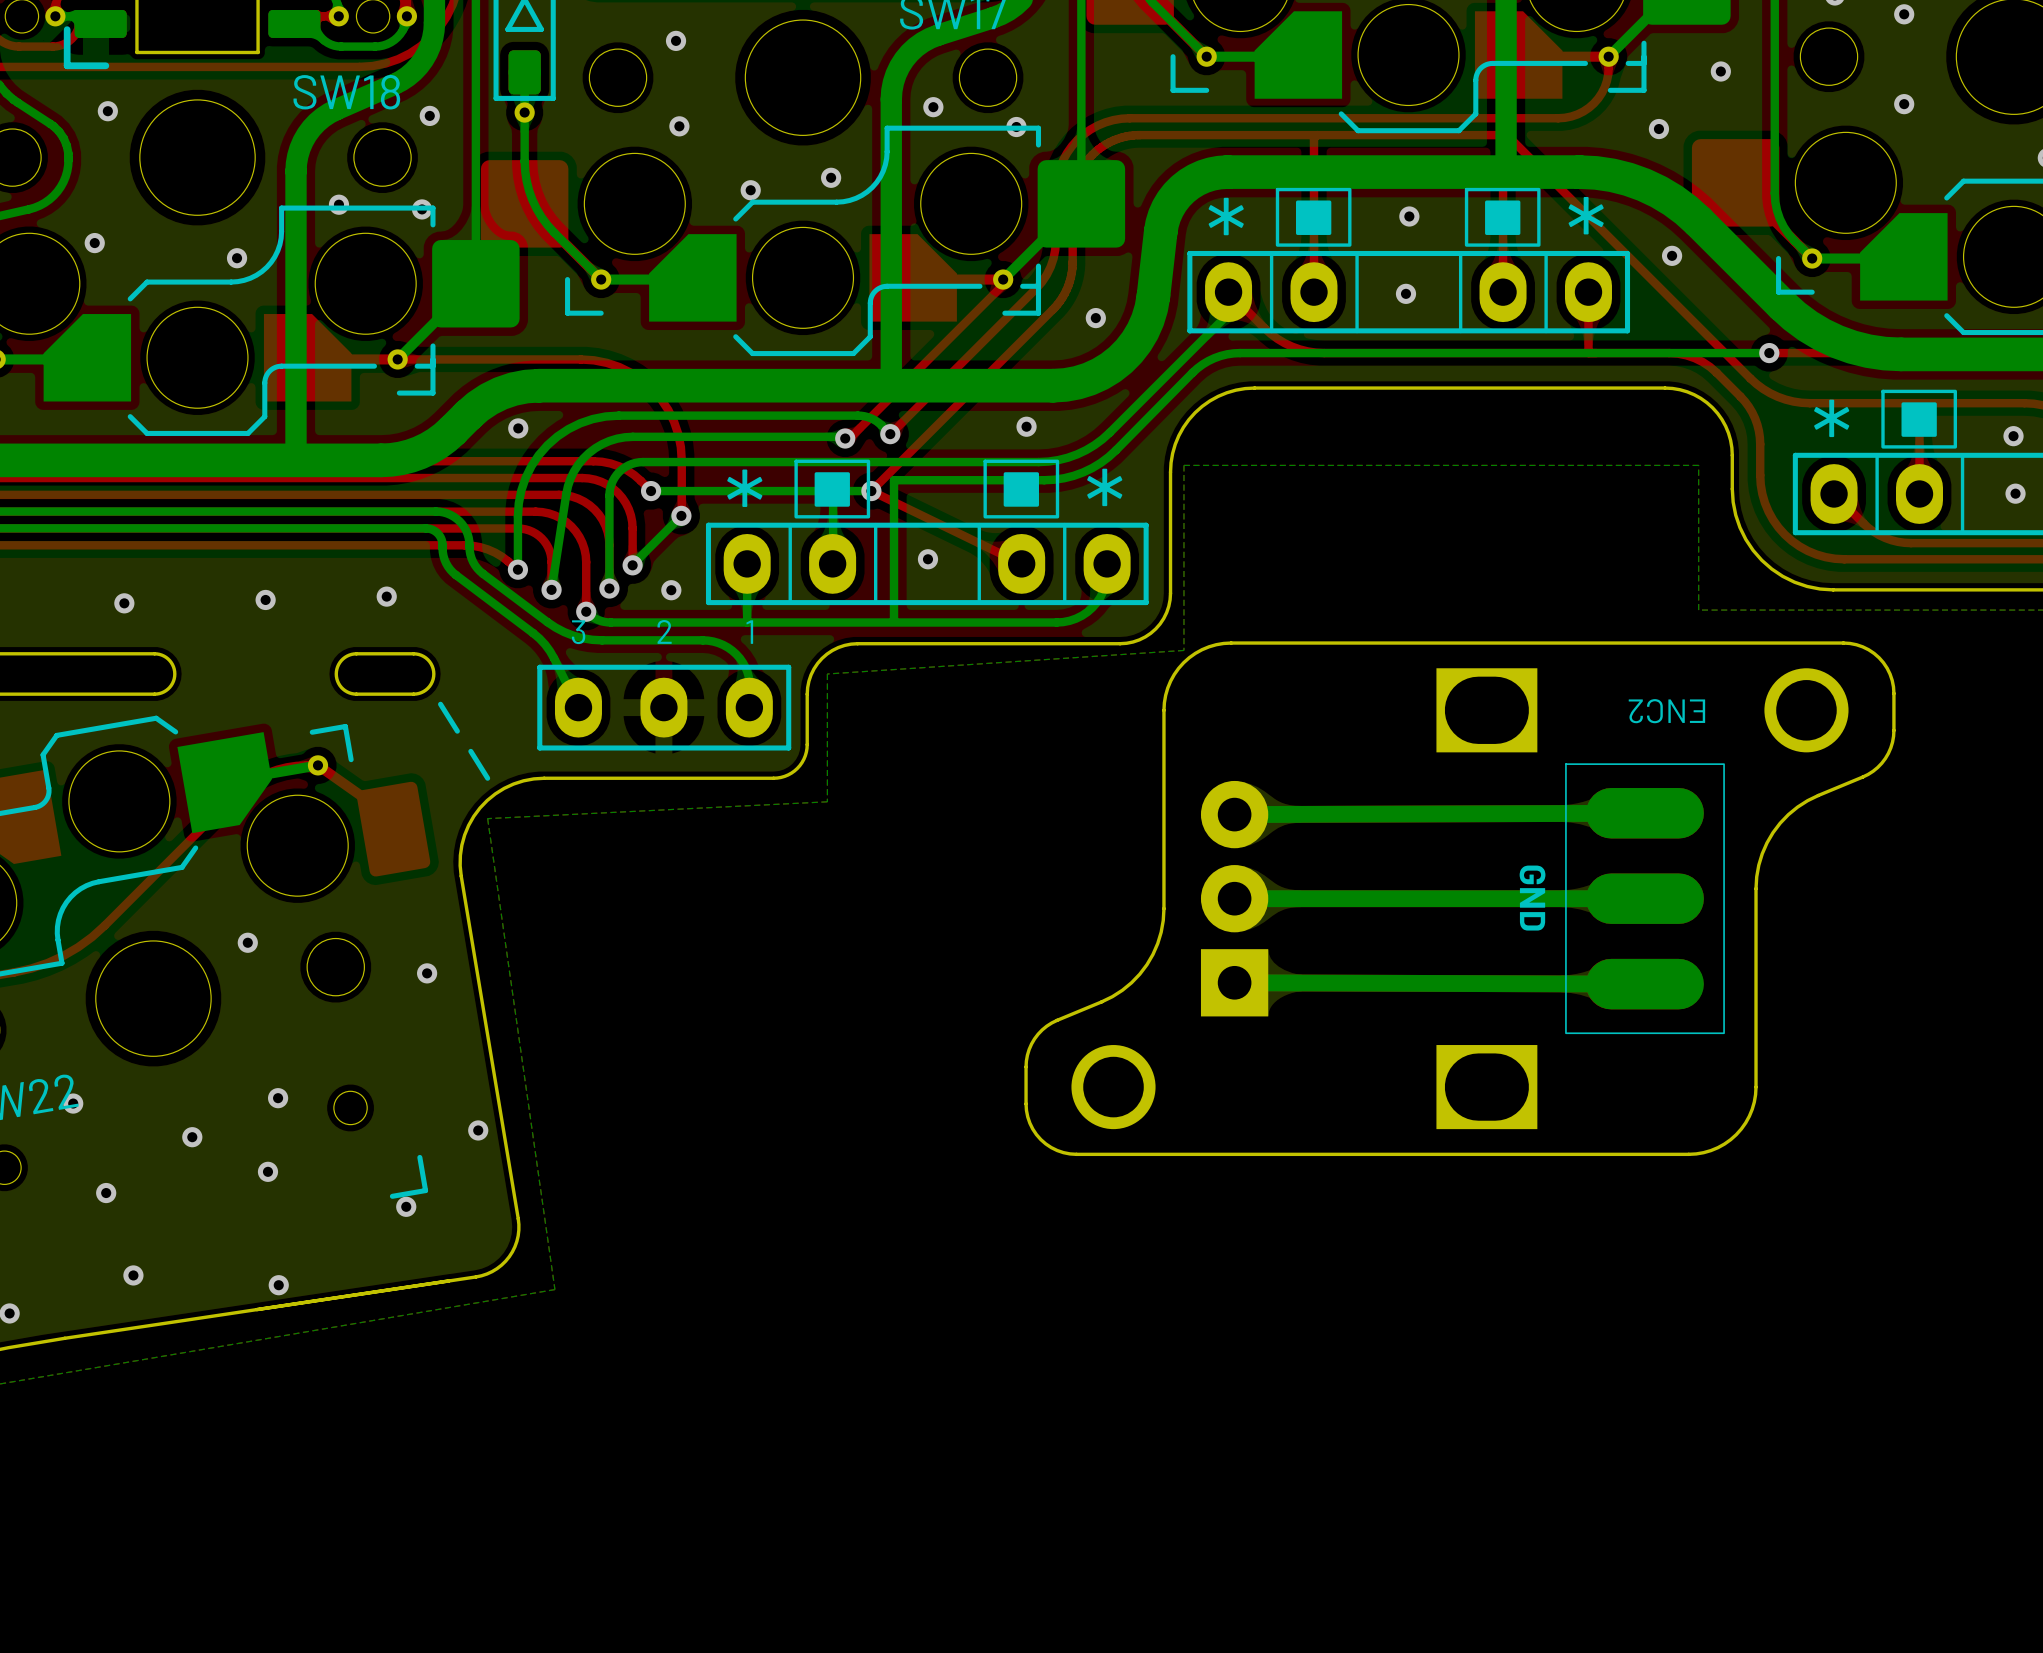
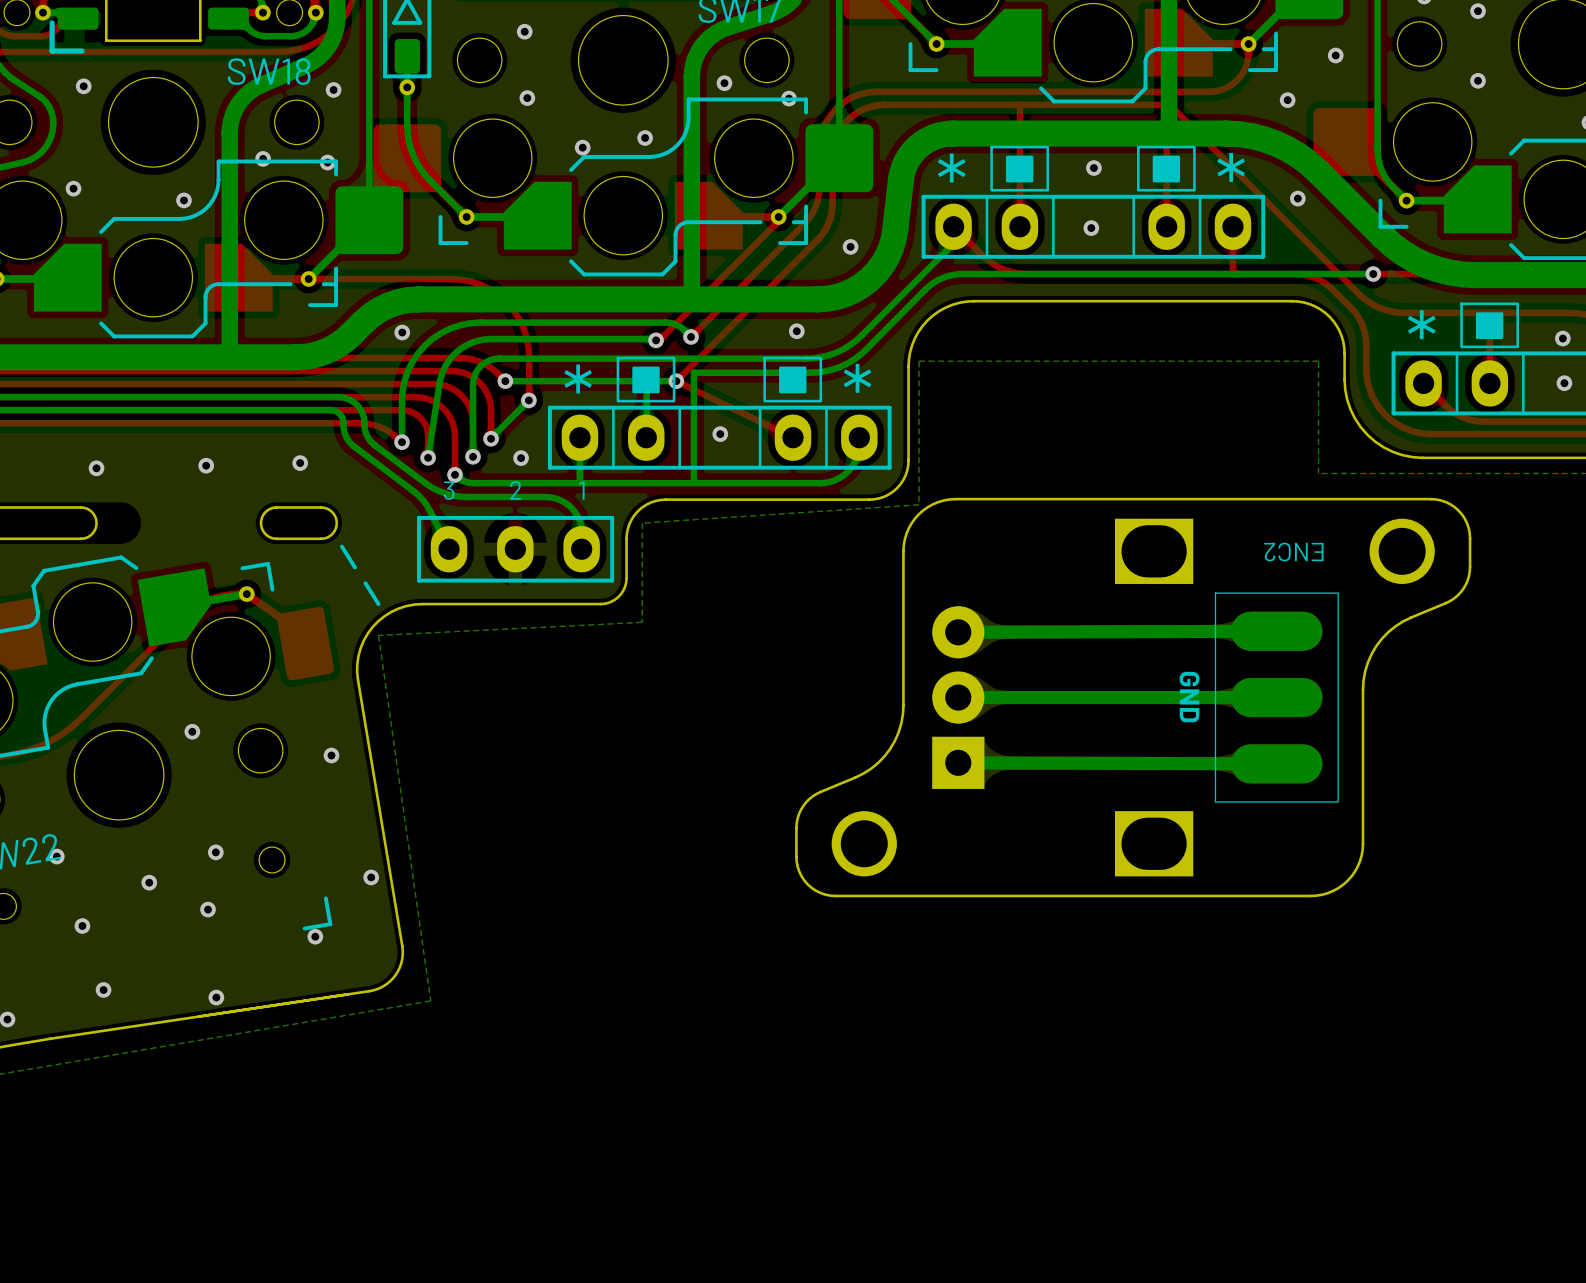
board edge: (104, 653) (159, 654) (171, 662) (174, 673) (171, 685) (159, 693) (104, 694) -> (80, 507) (91, 511) (96, 523) (92, 533) (80, 538)

